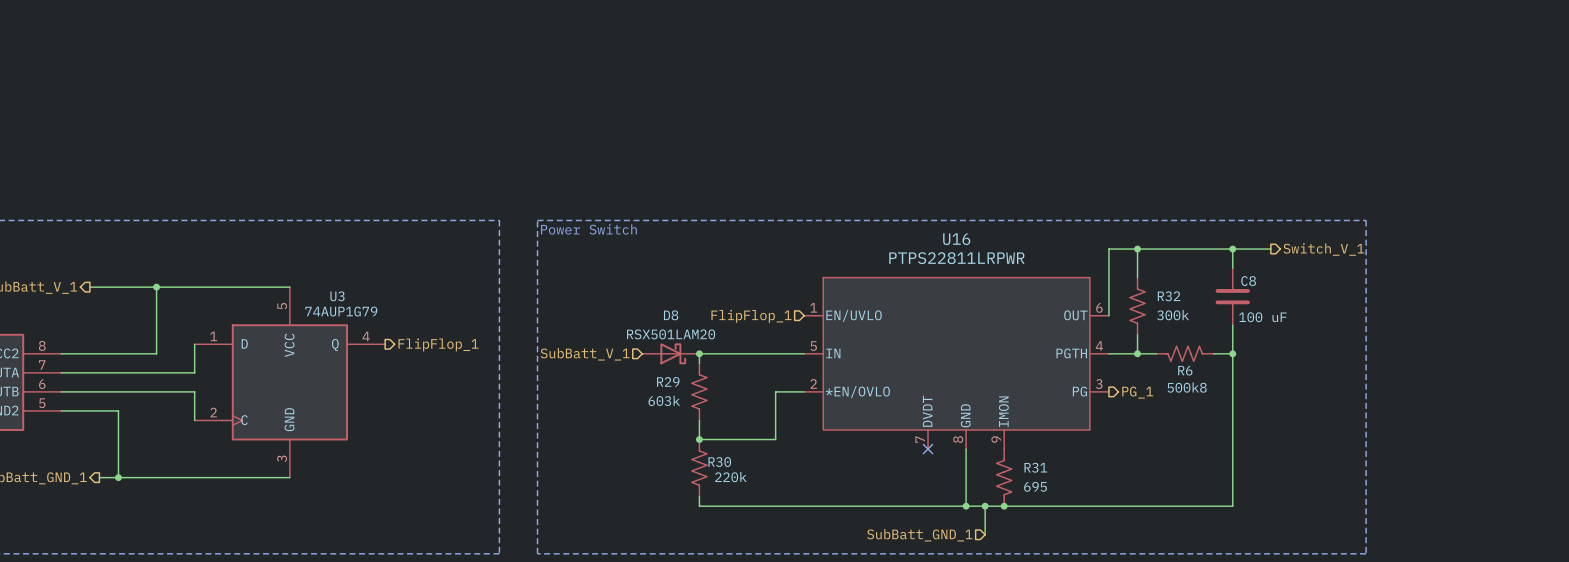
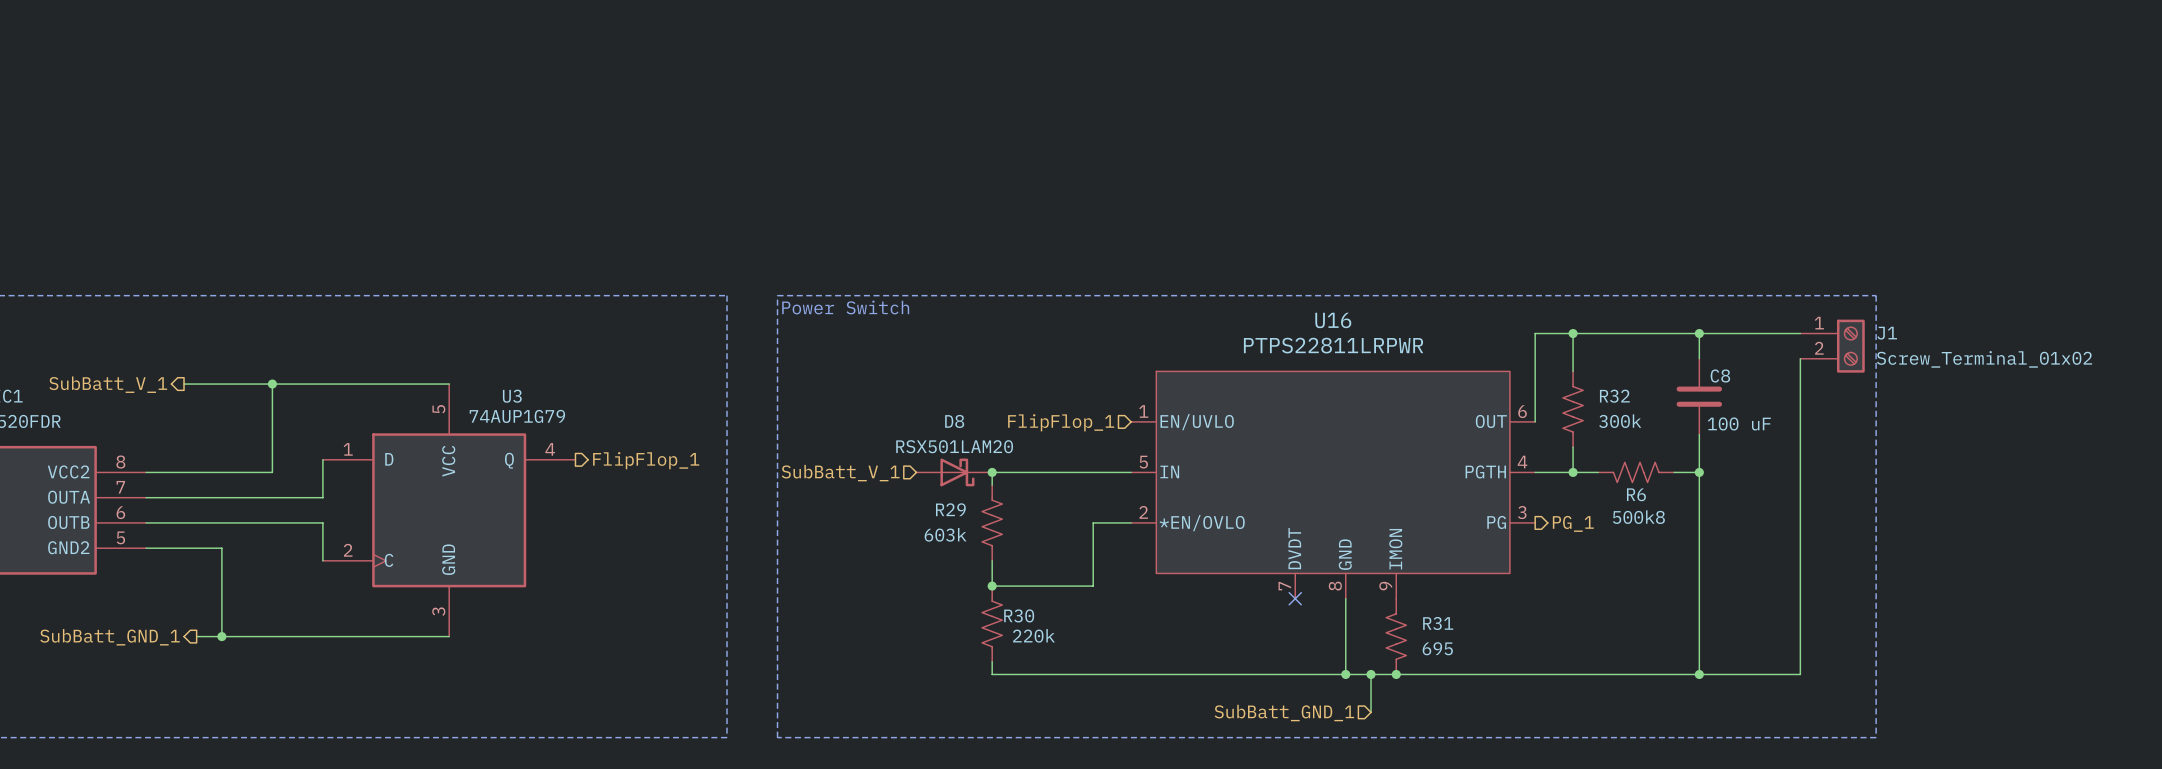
wire: none -> (1749, 333) (1800, 333)
hierarchical label: Switch_V_1 (1323, 249) -> none
J1: none -> Screw_Terminal_01x02 (1832, 346)
wire: none -> (1800, 358) (1800, 674) (1699, 674)
junction: none -> (1699, 674)

